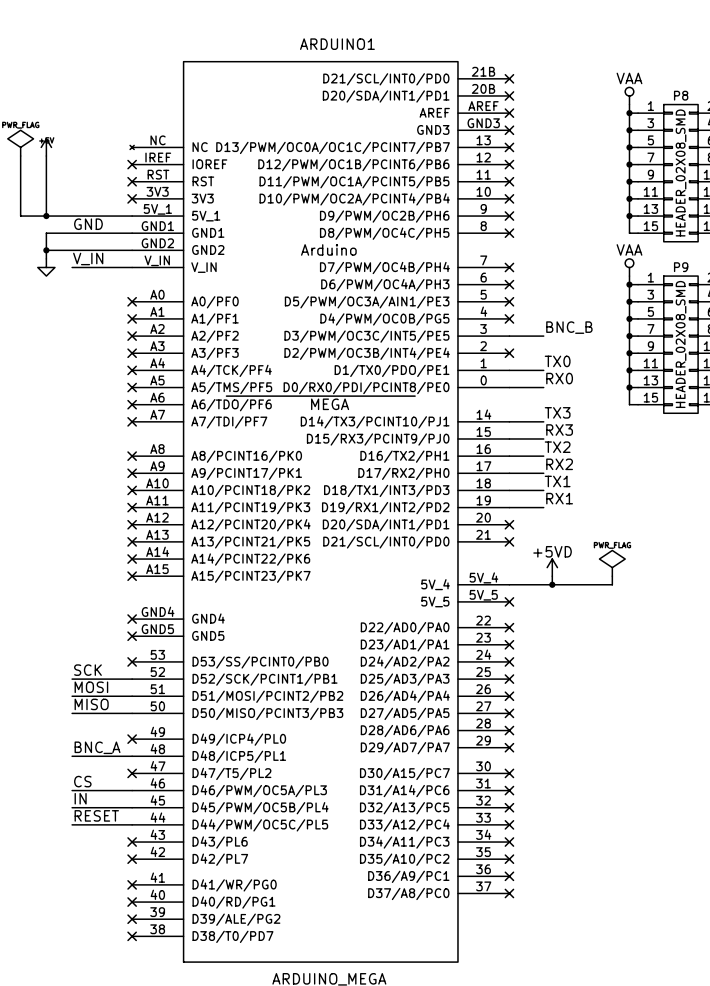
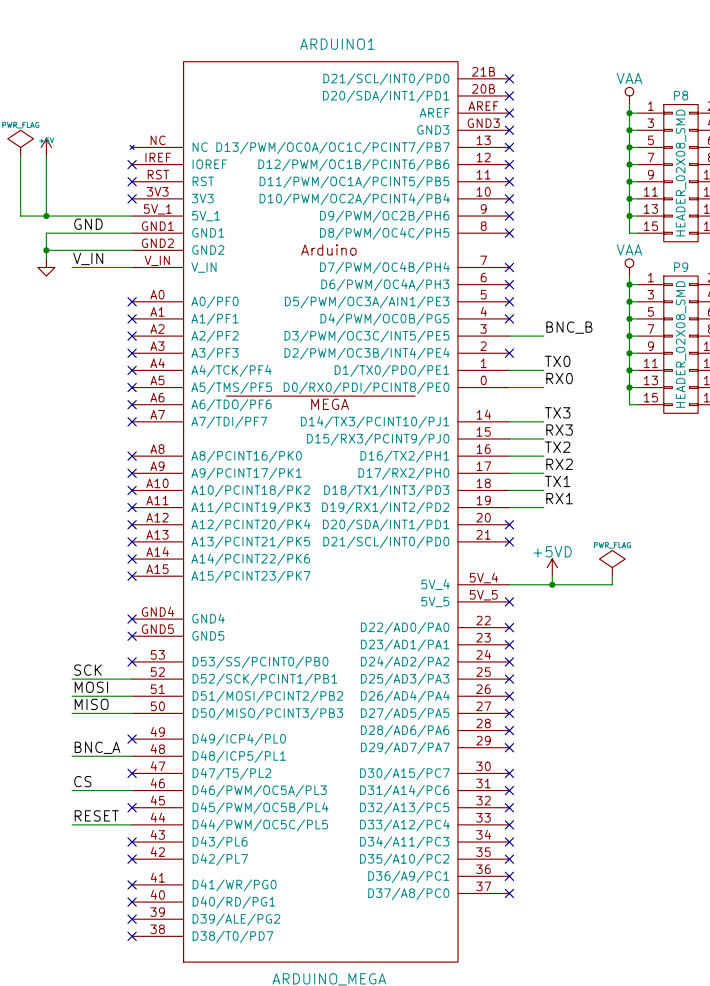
label: IN (80, 798) -> none
wire: (72, 807) (132, 807) -> none
no-connect mark: none -> (132, 807)

